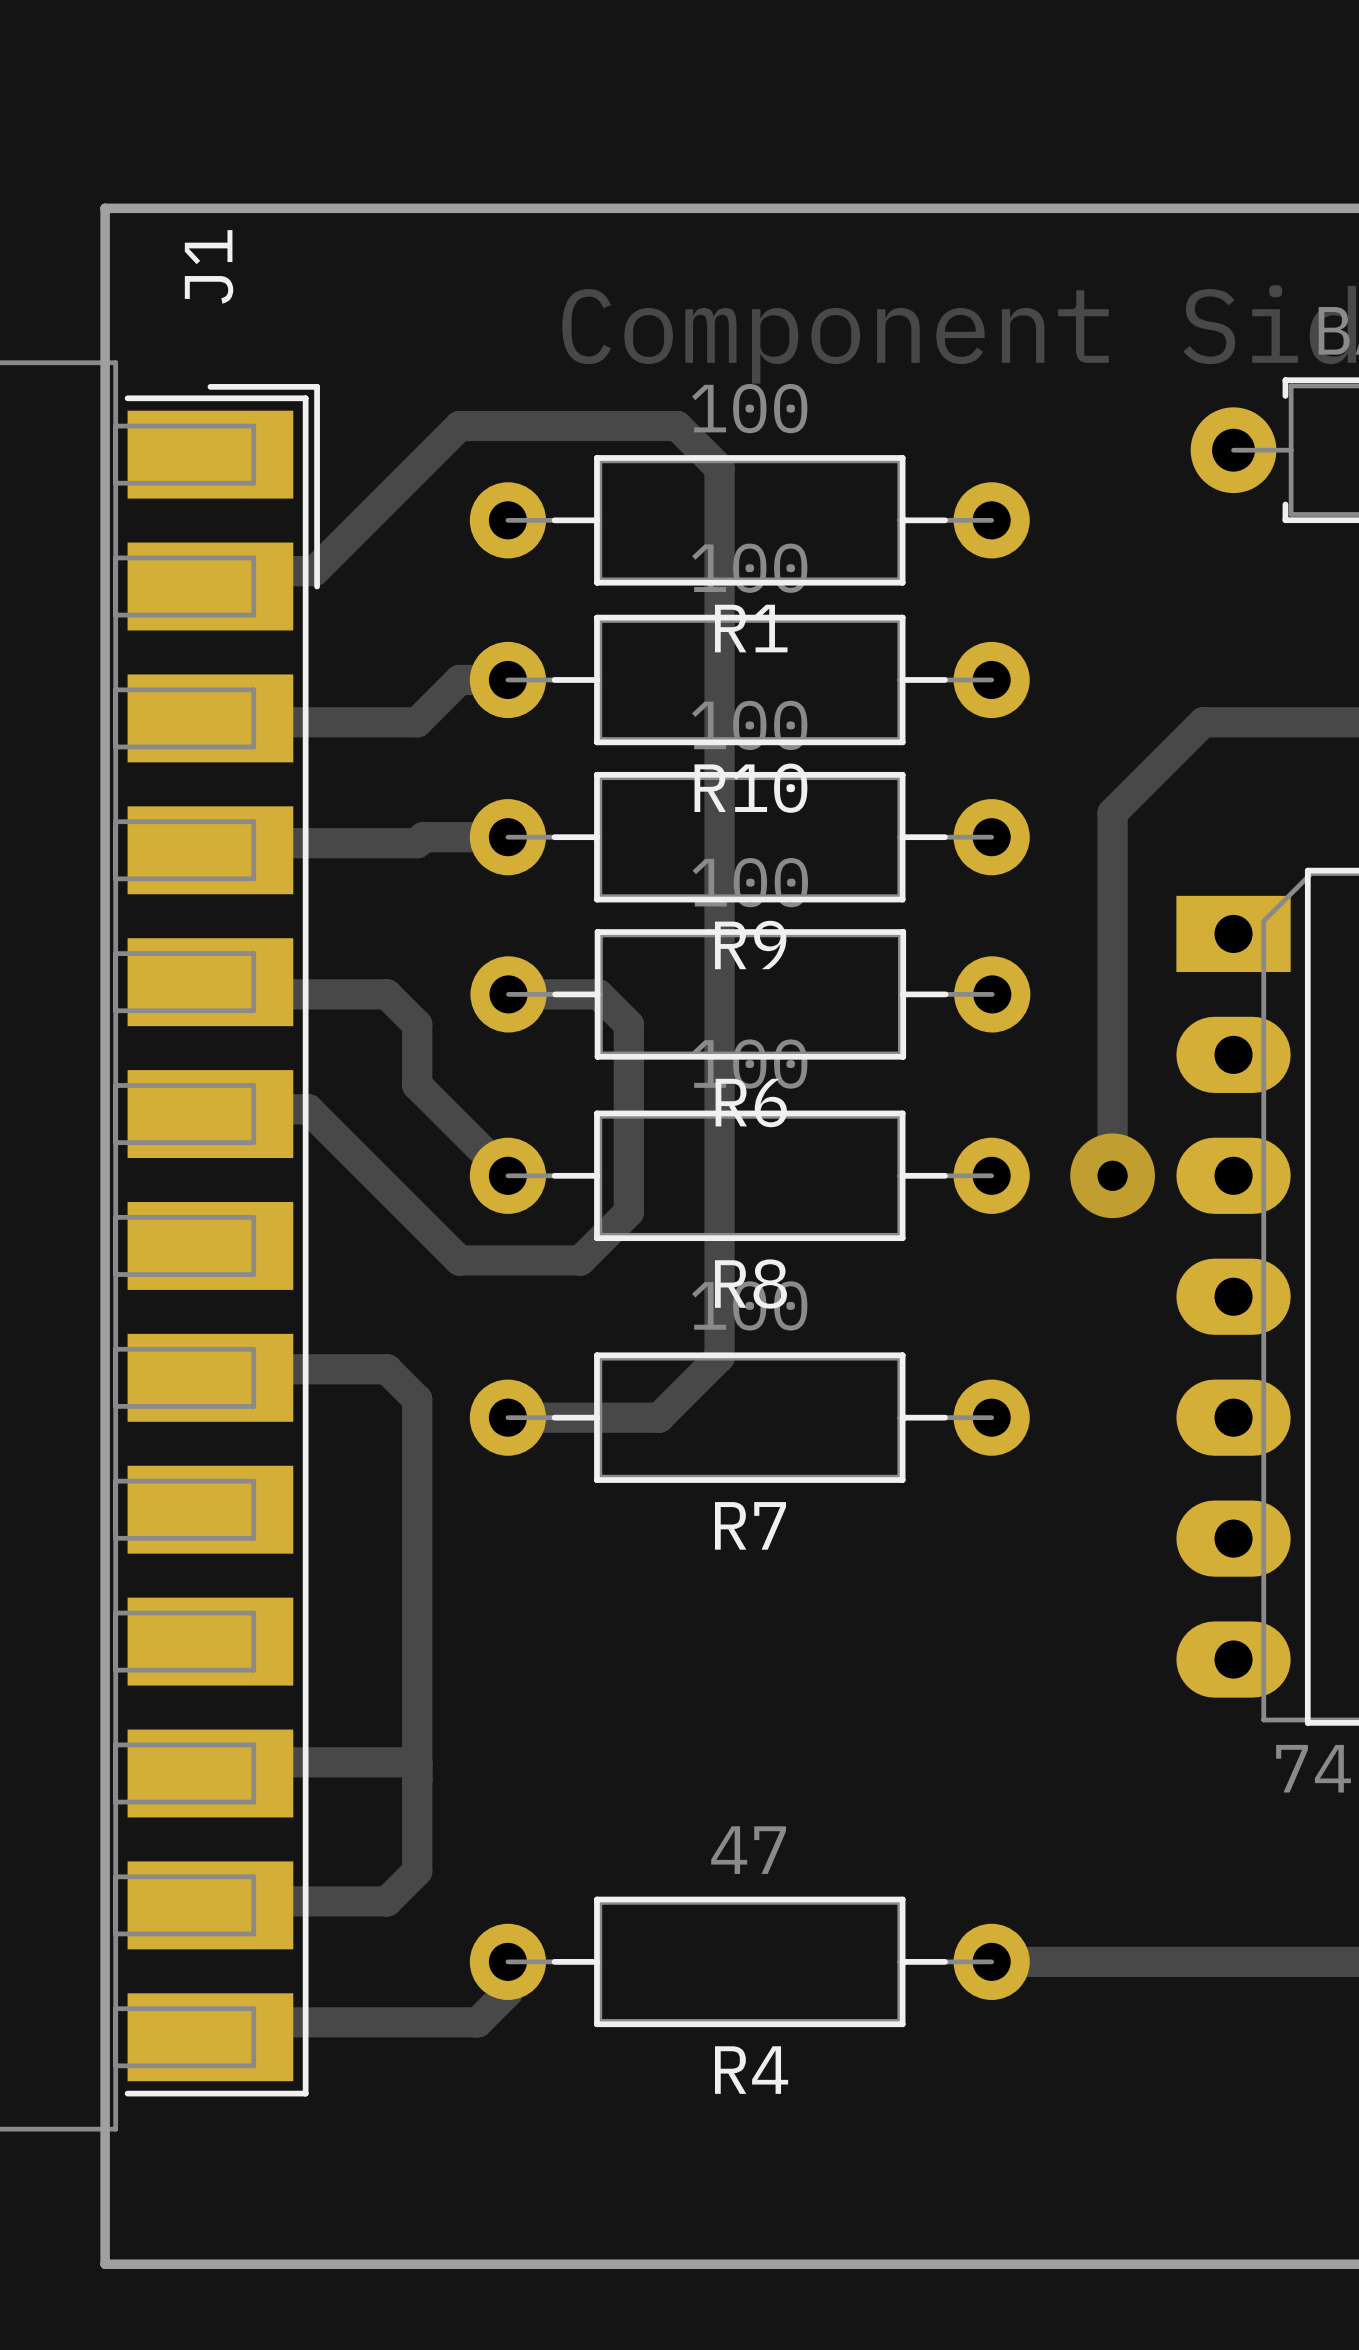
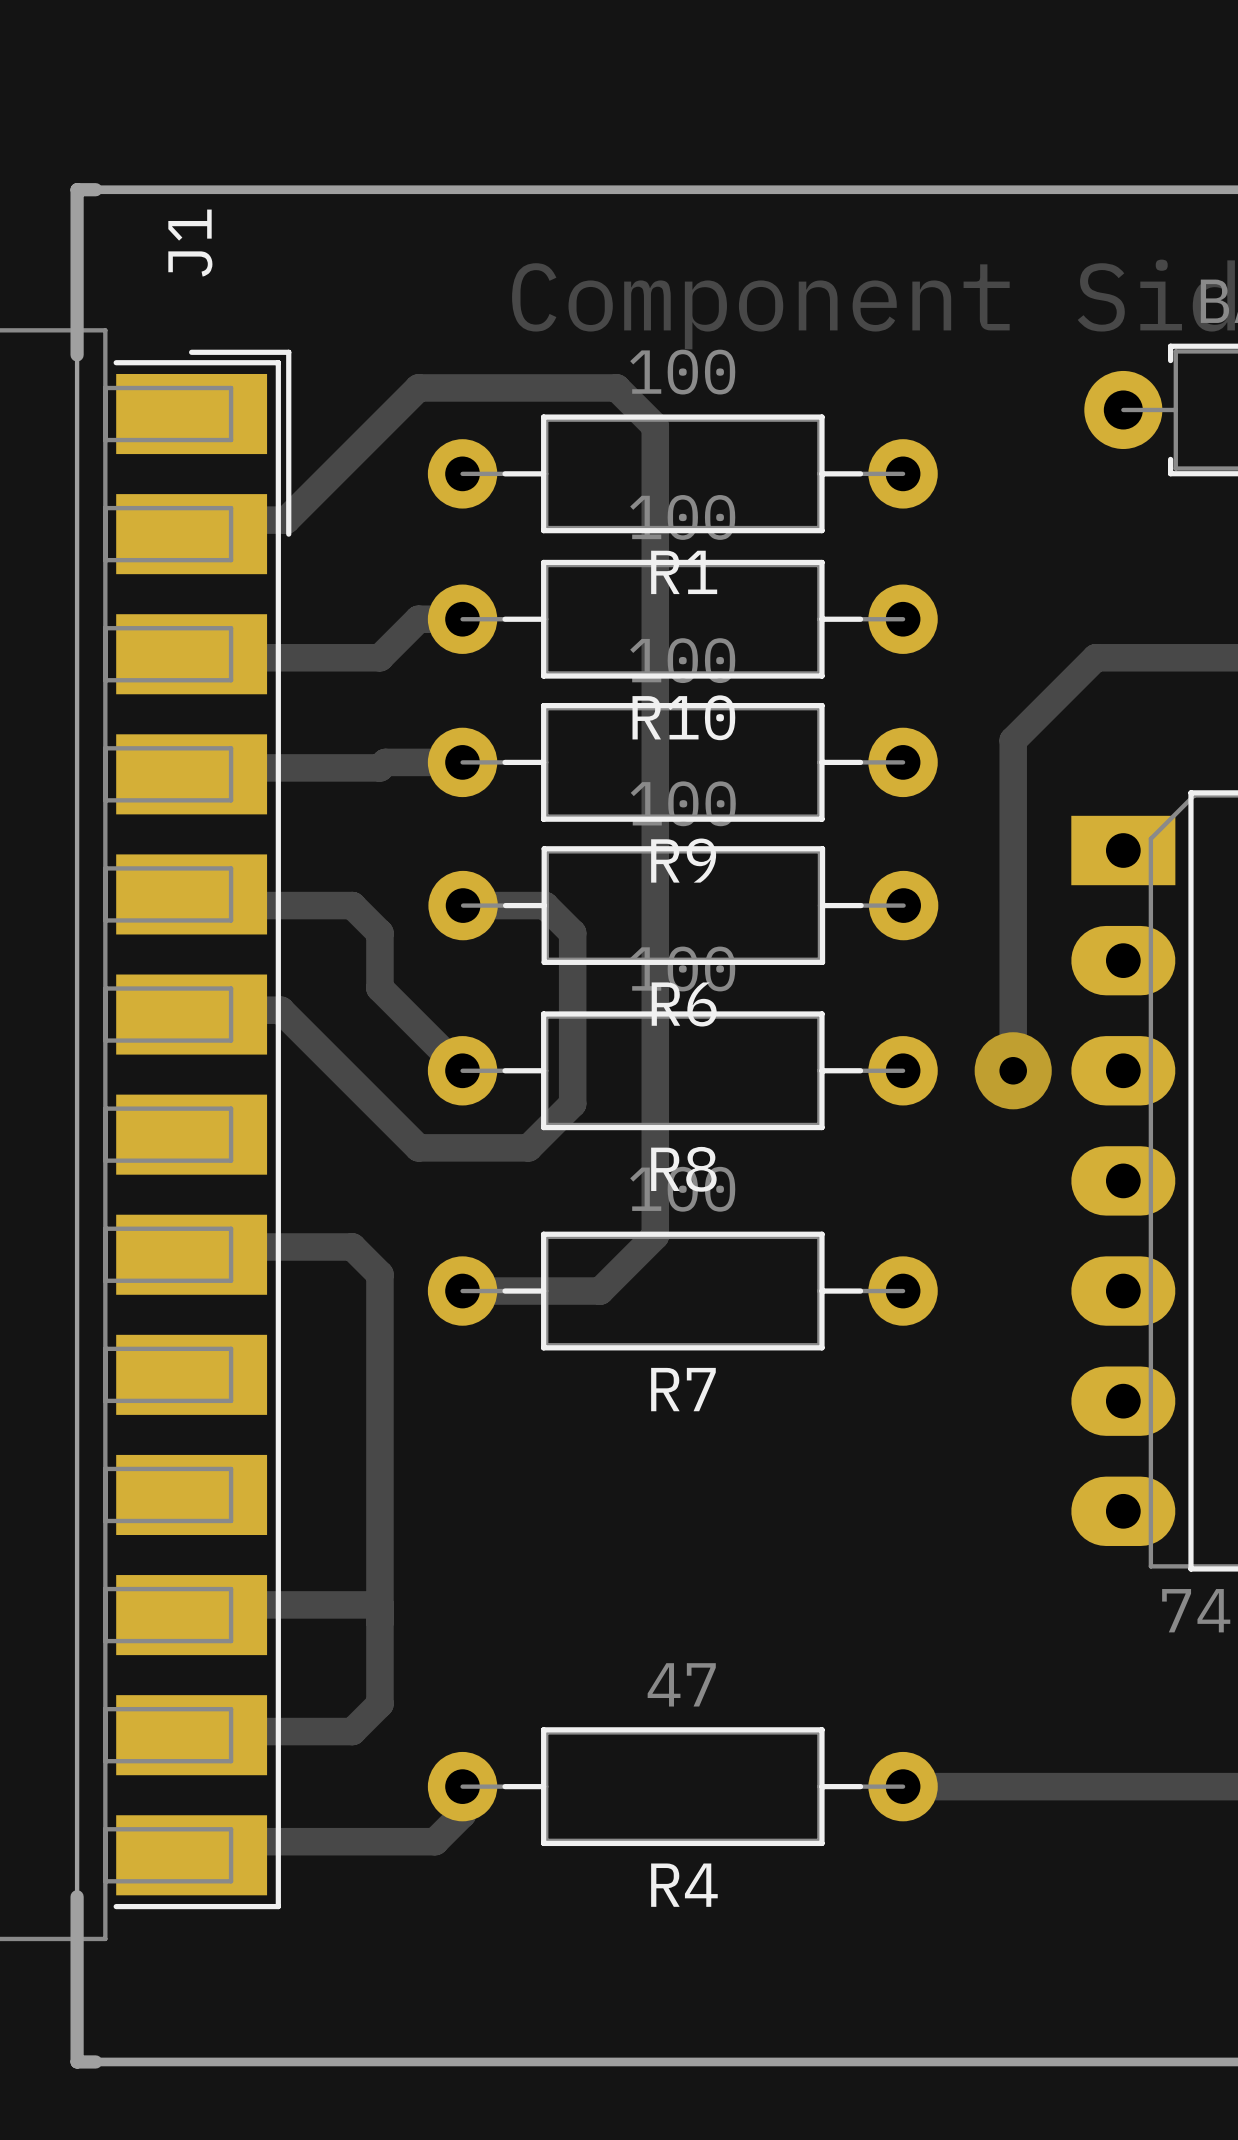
board edge: (105, 208) (105, 2264) -> (95, 189) (77, 189) (77, 354) (77, 2061) (95, 2061)

